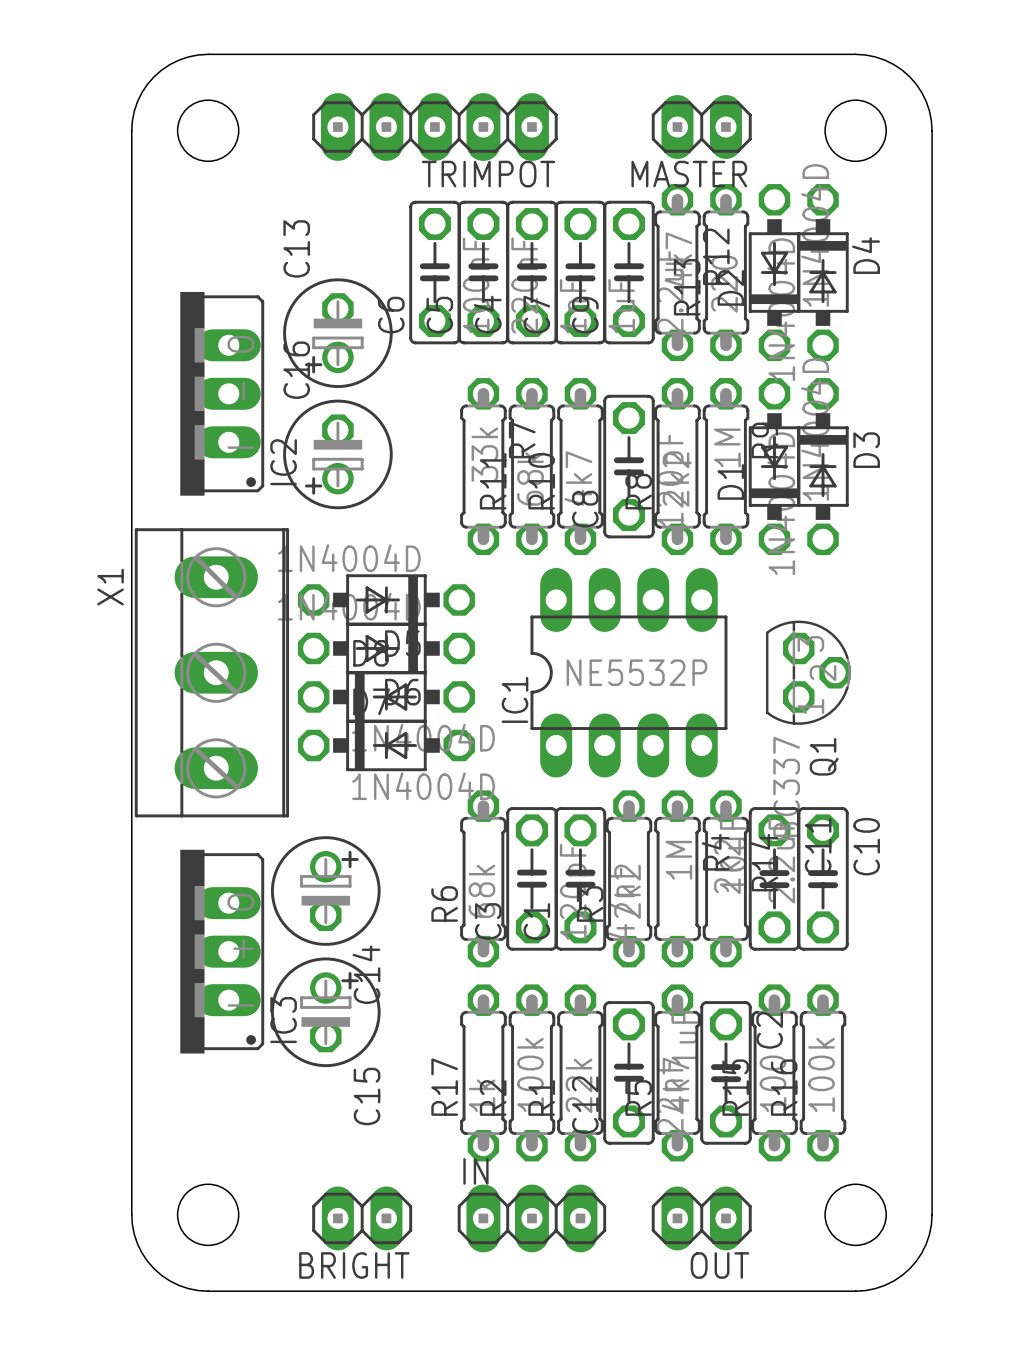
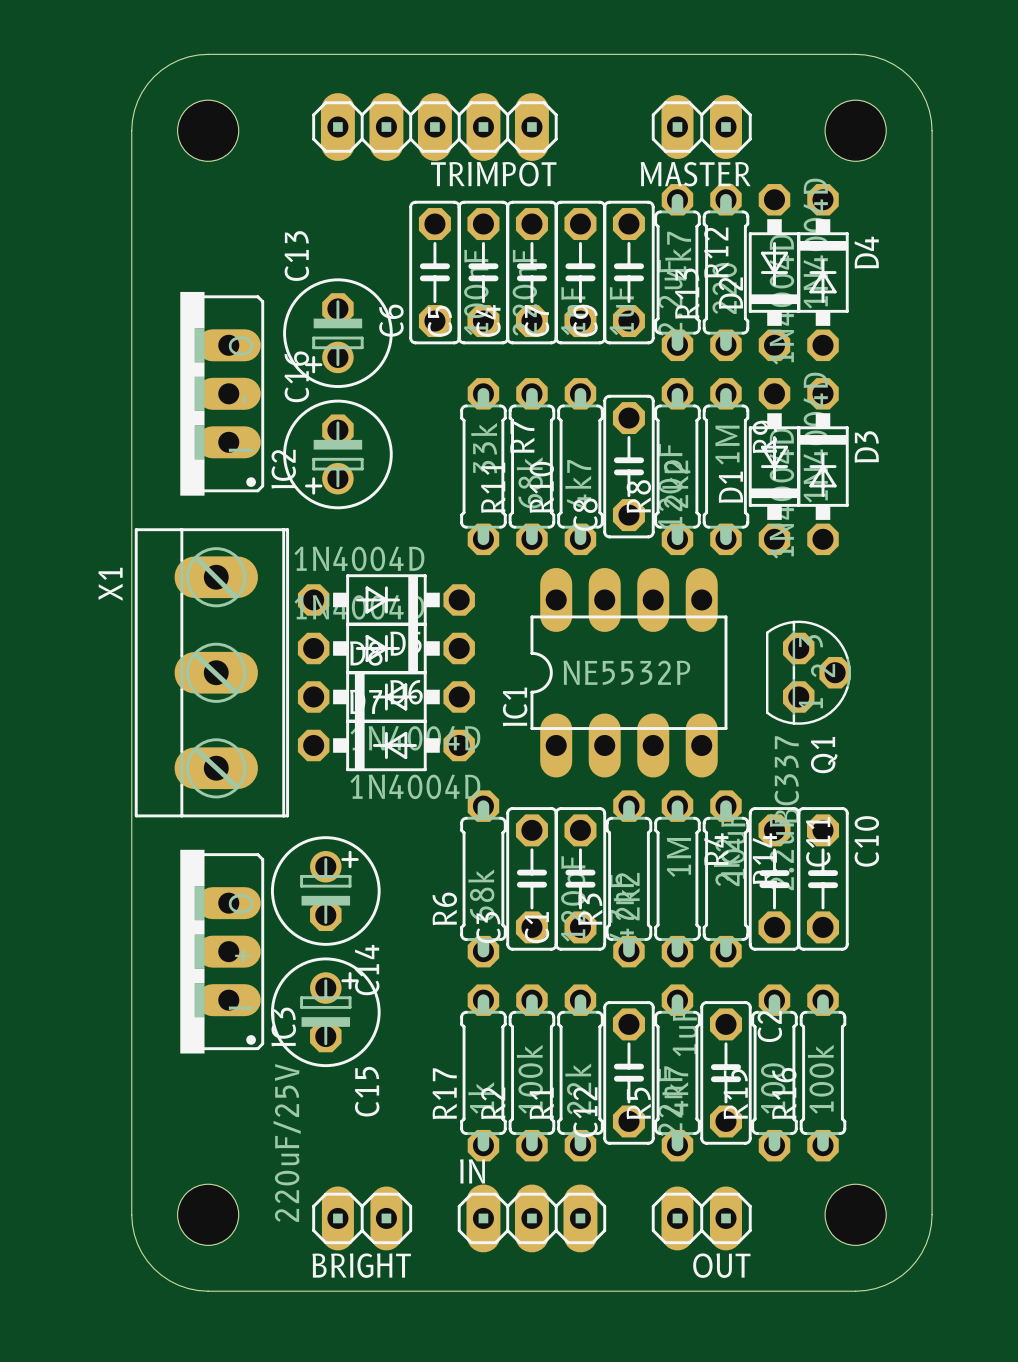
C15 value: none -> 220uF/25V (287, 1142)

